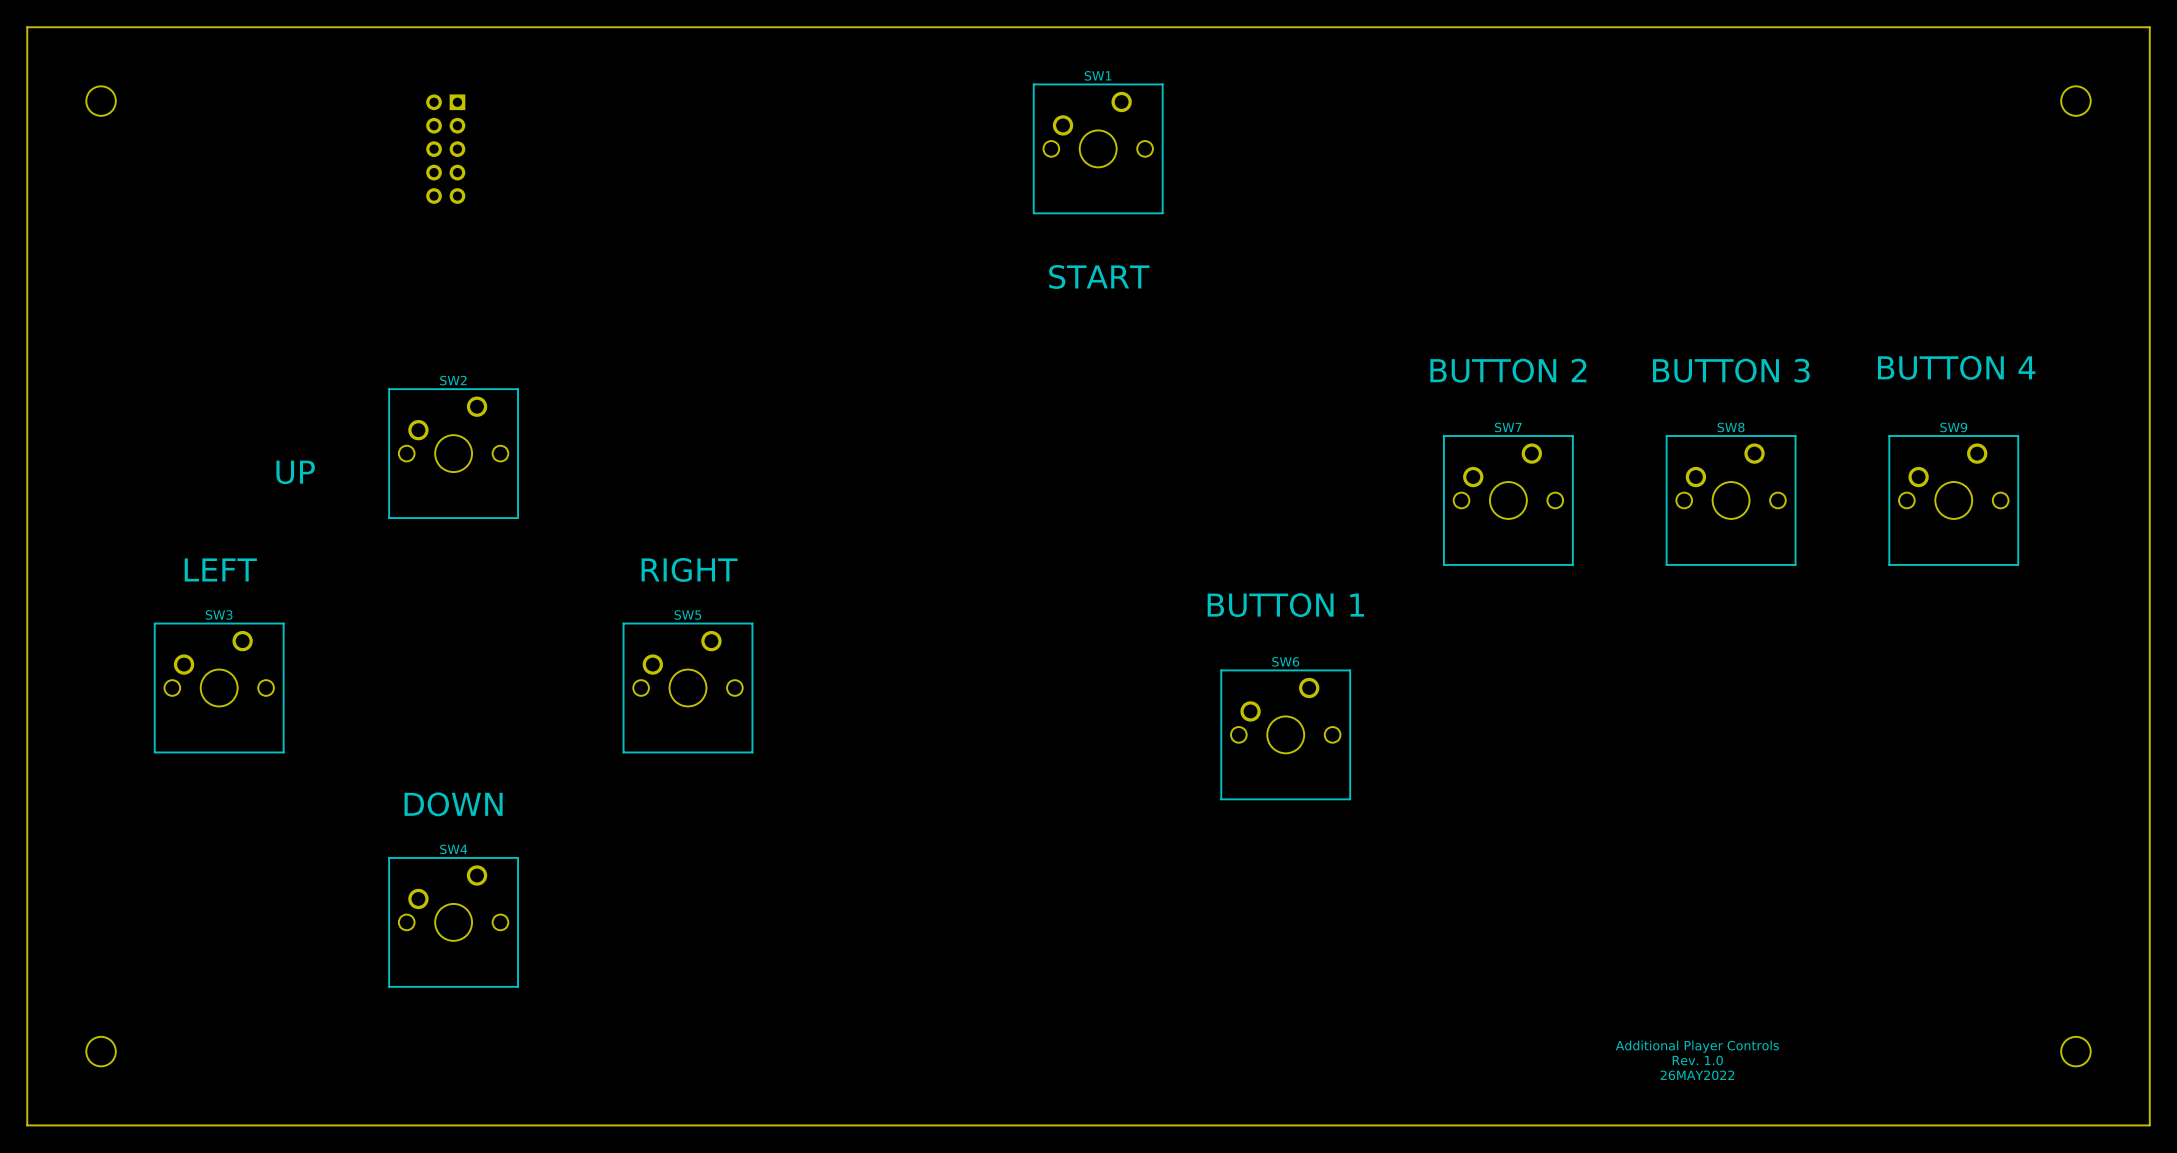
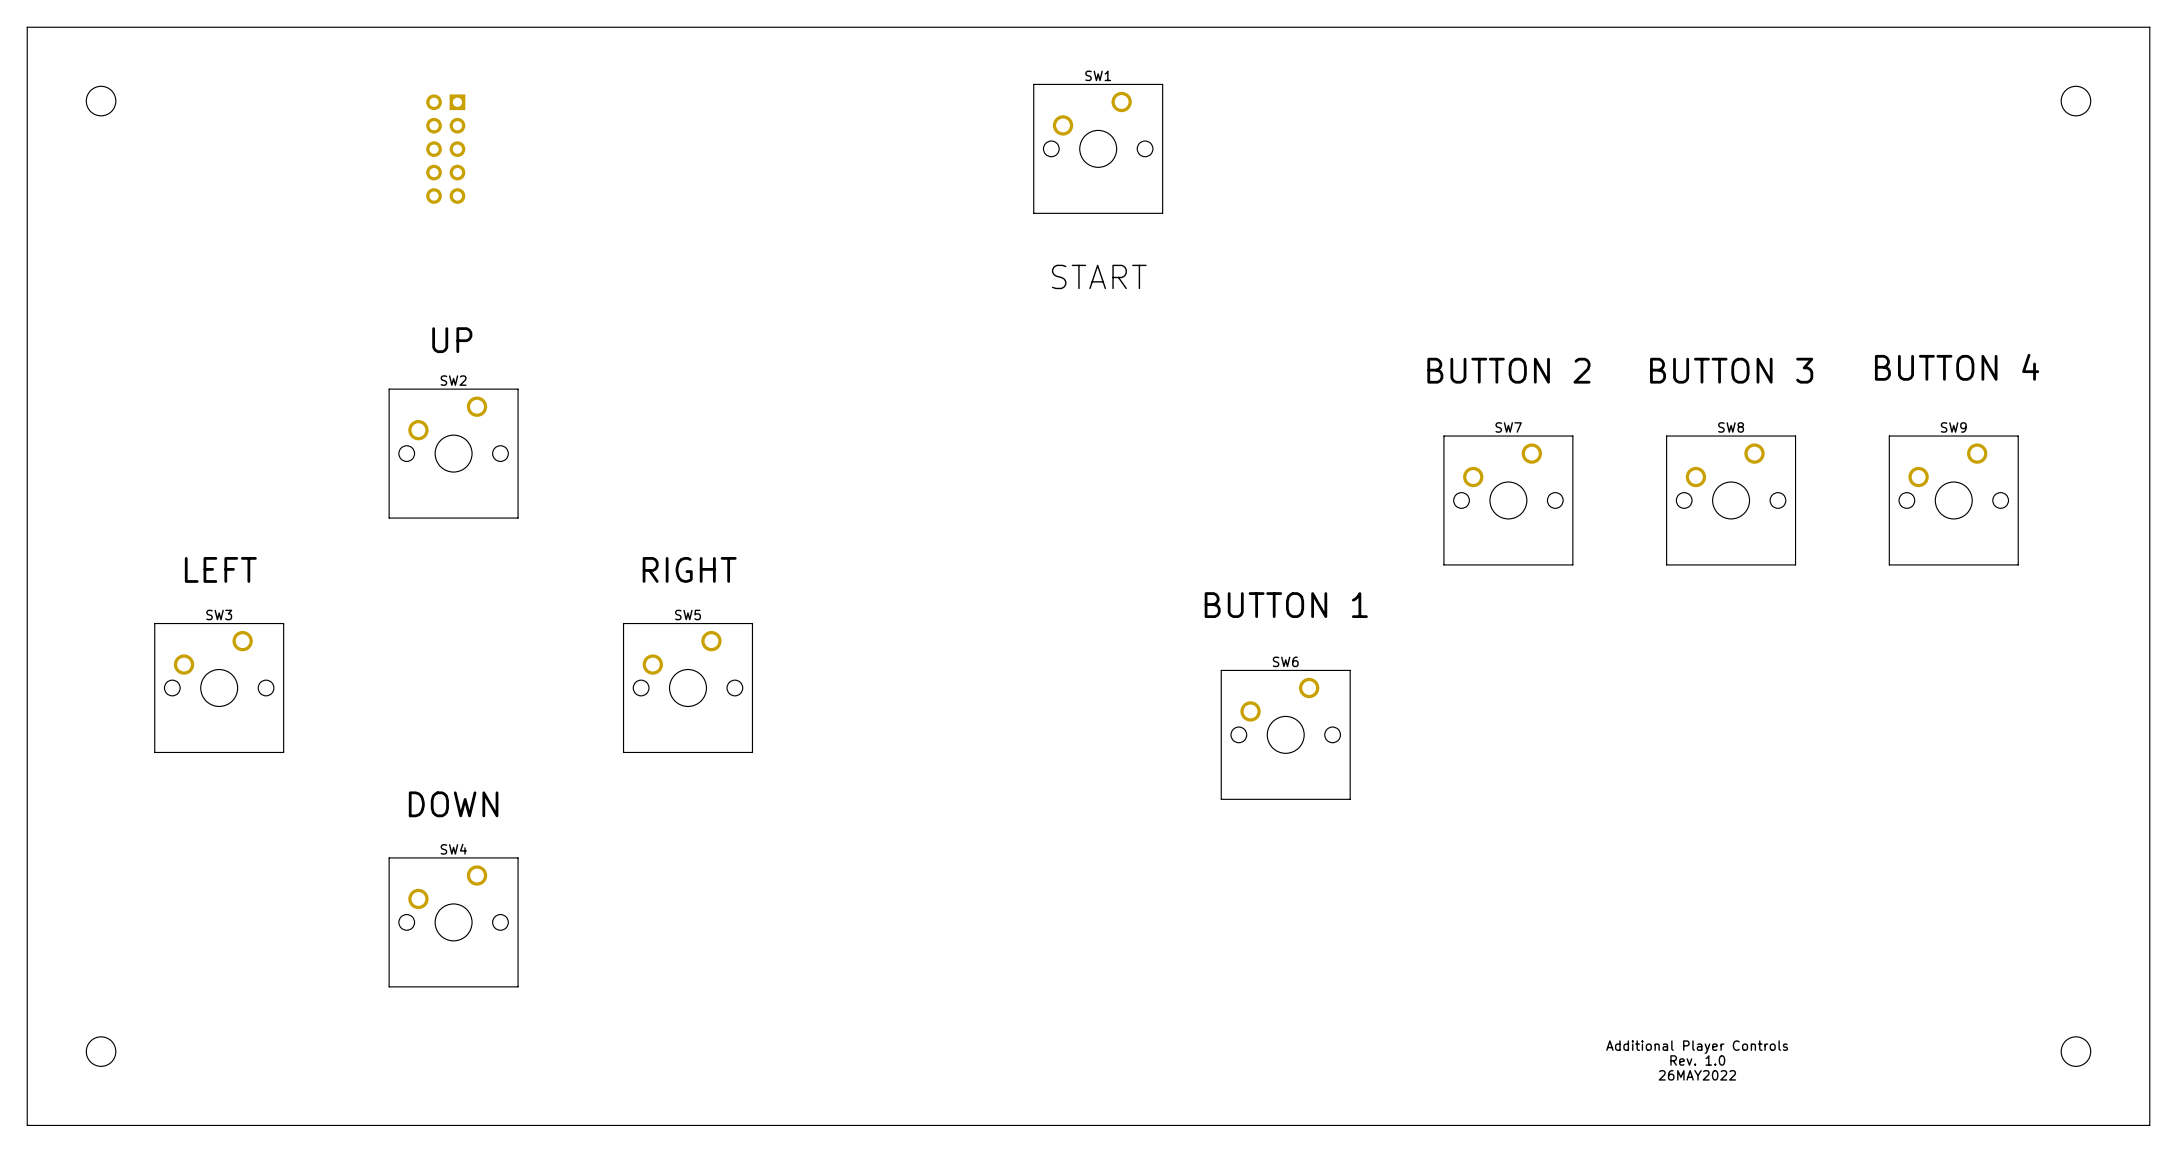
text position: UP (295, 472) -> UP (452, 340)

